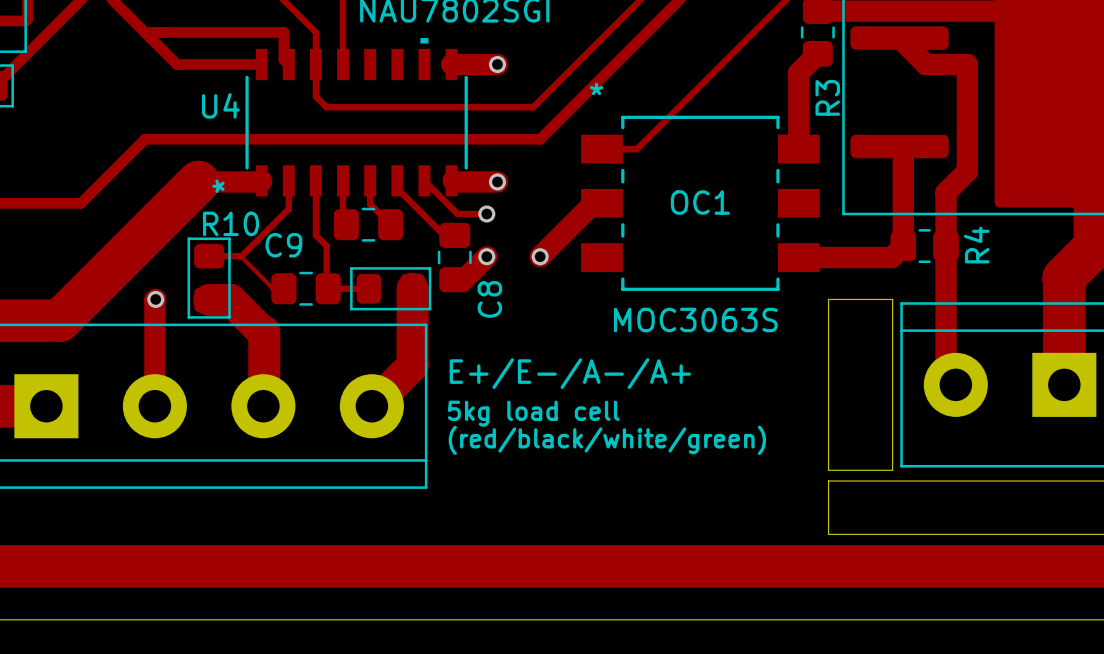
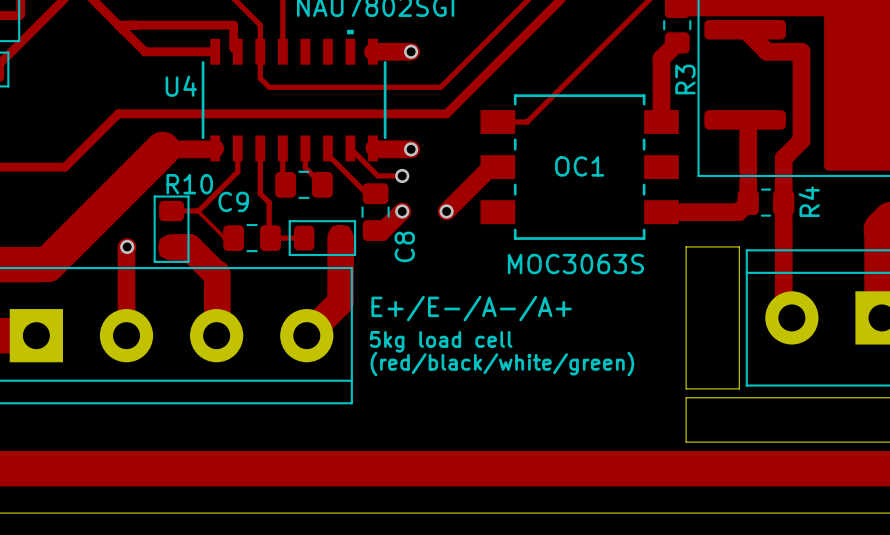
OC1 text: * (596, 89) -> none
U4 text: * (218, 186) -> none

